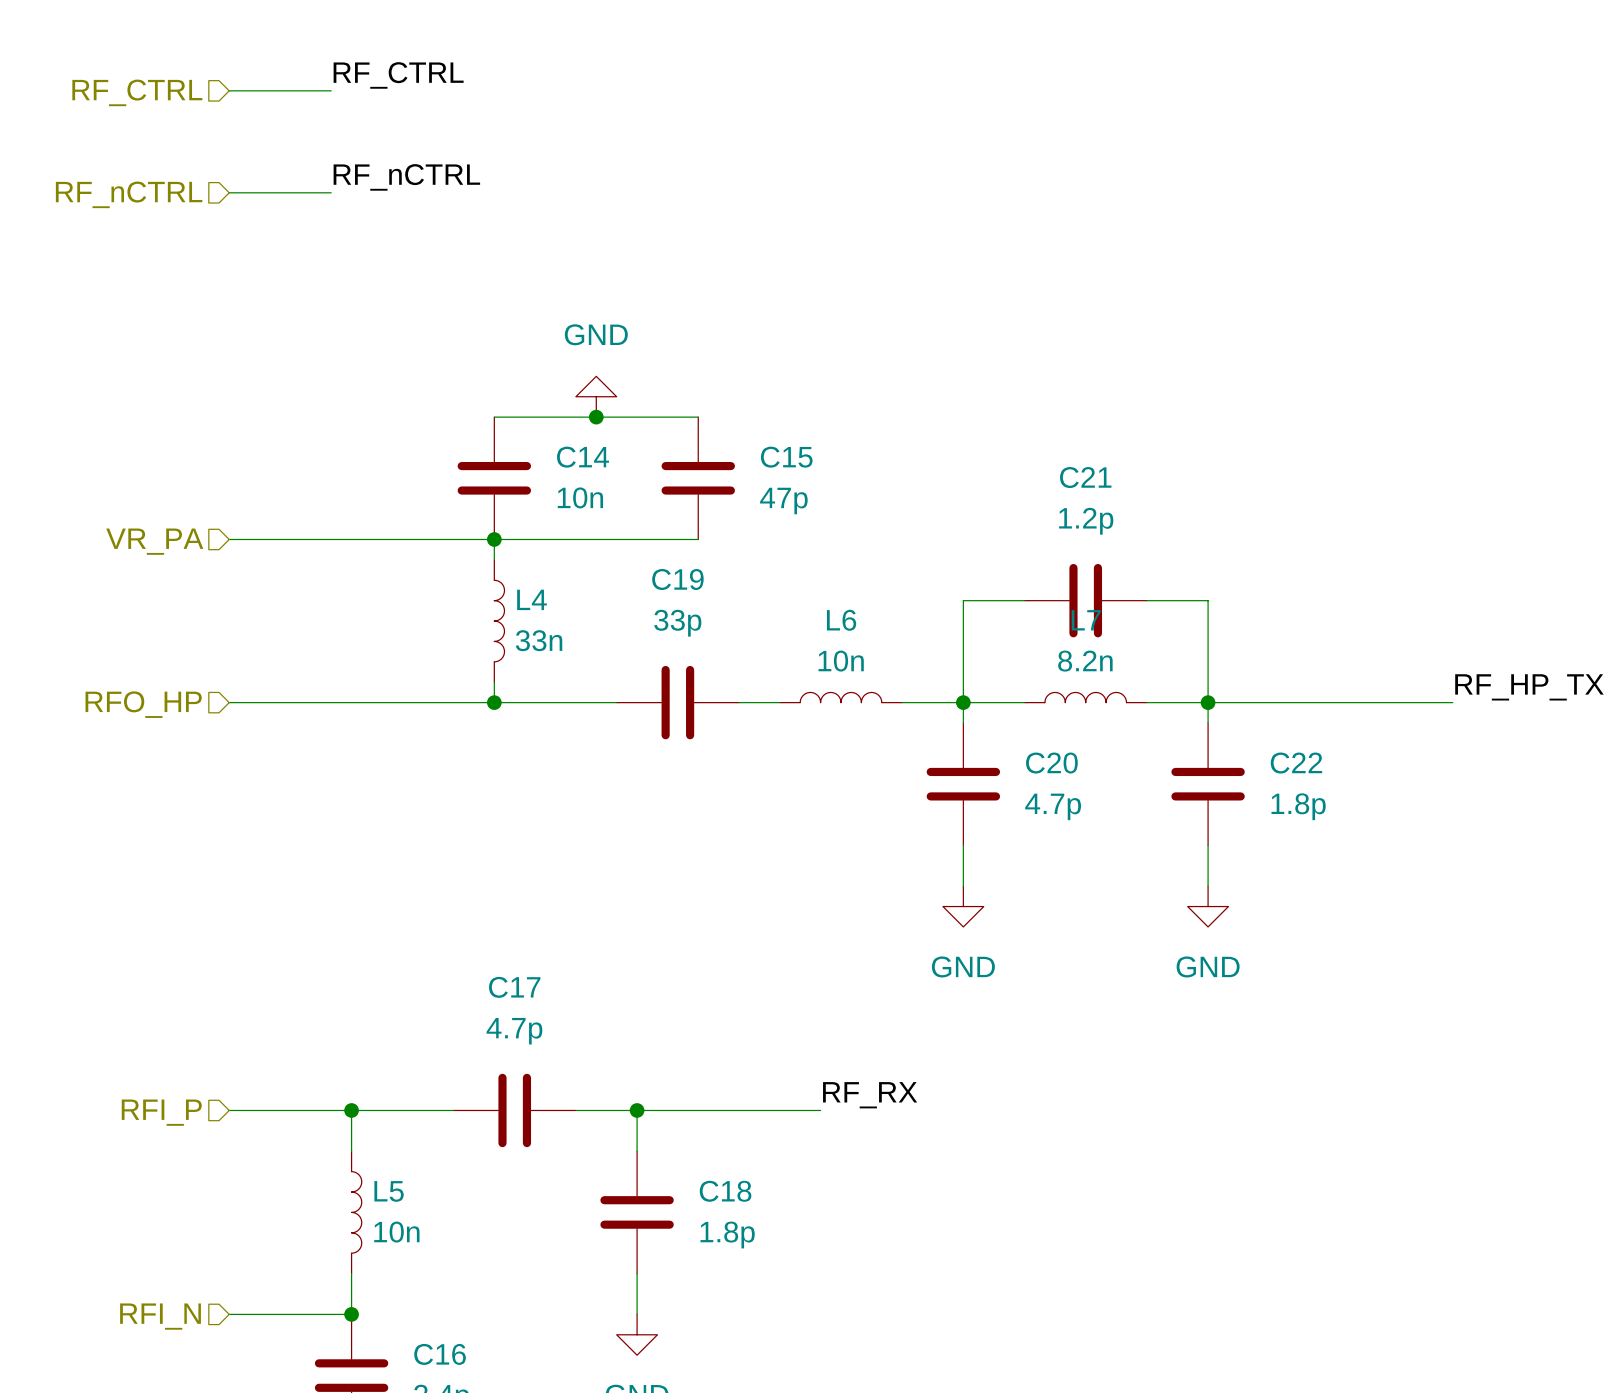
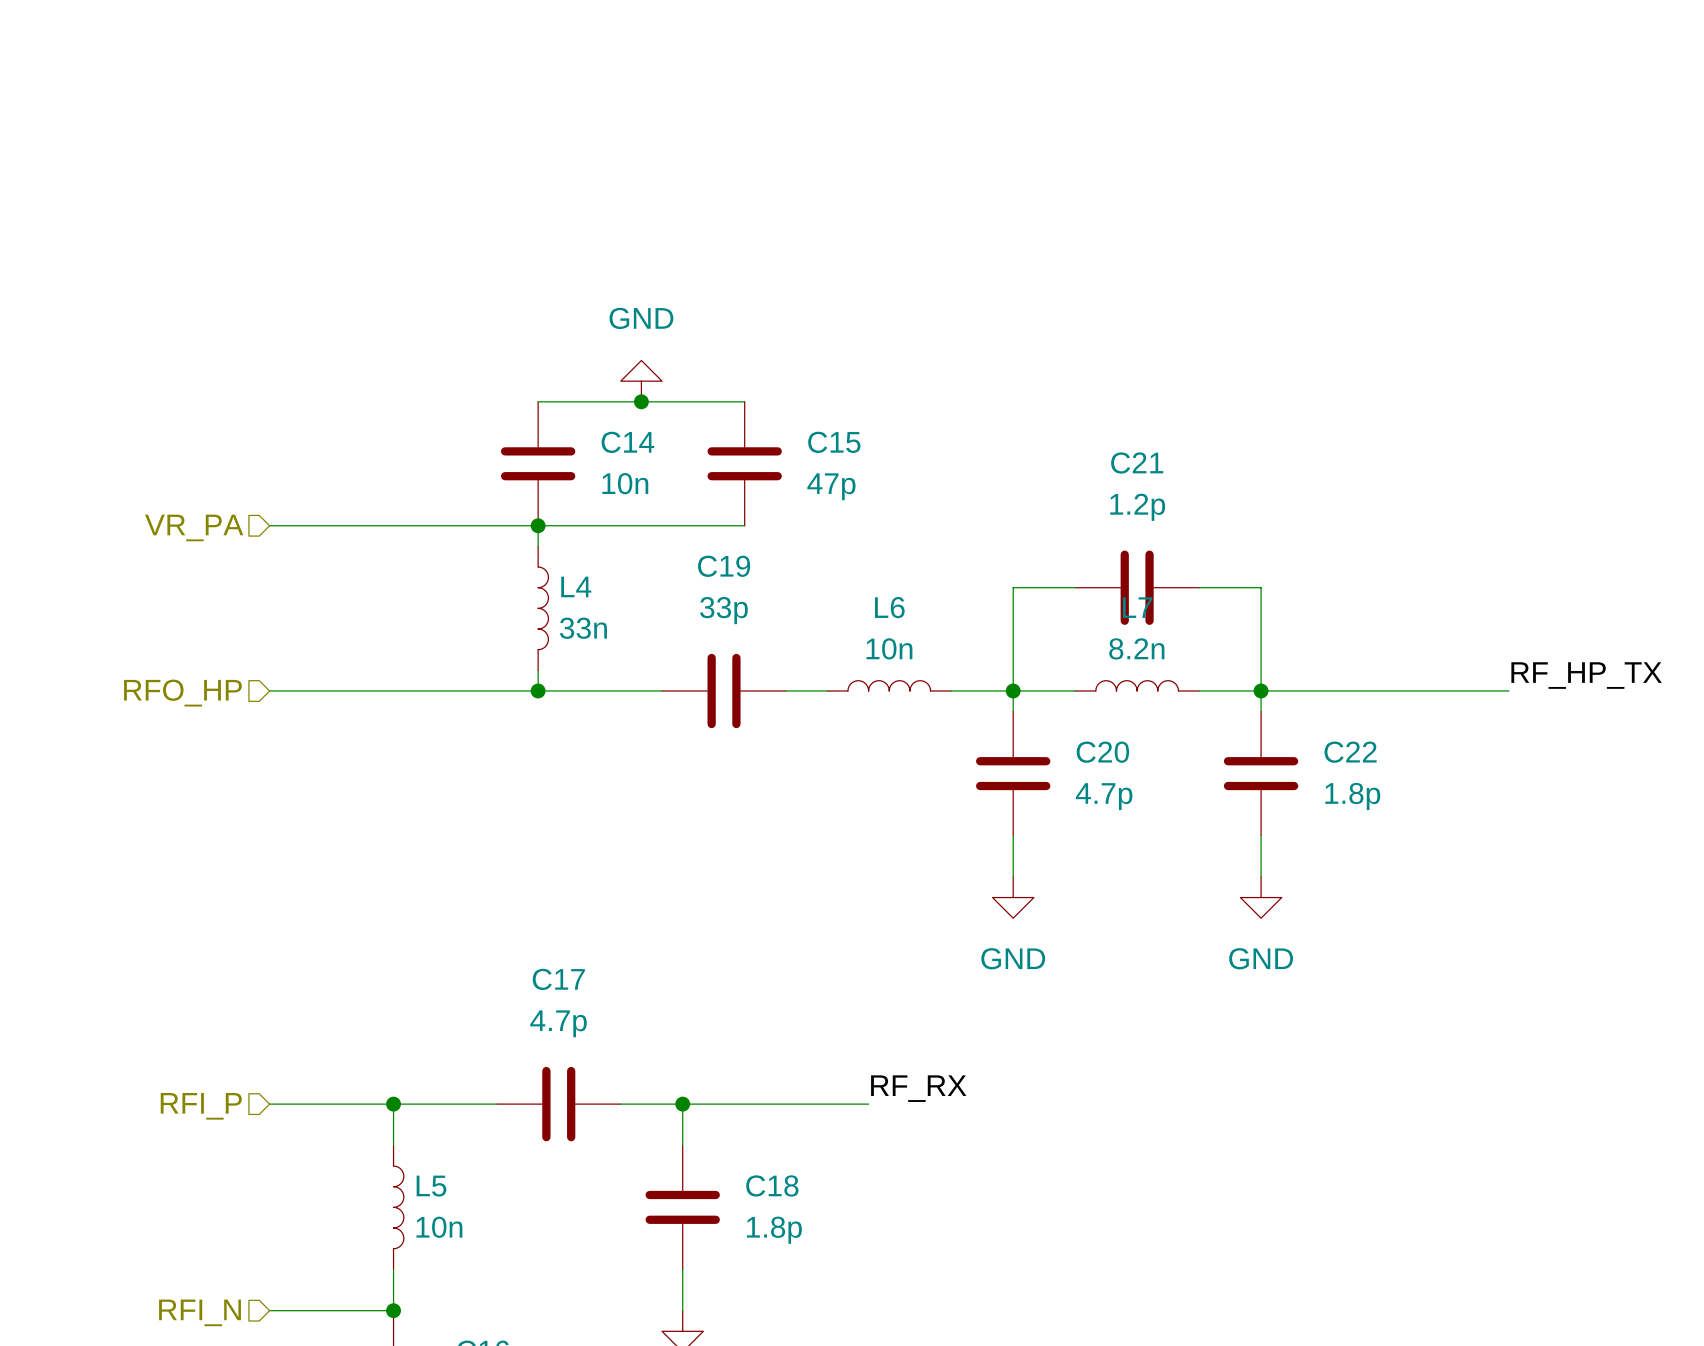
label: RF_CTRL (398, 75) -> none
wire: (229, 90) (331, 90) -> none
hierarchical label: RF_CTRL (137, 92) -> none
label: RF_nCTRL (406, 177) -> none
wire: (229, 192) (331, 192) -> none
hierarchical label: RF_nCTRL (129, 194) -> none

